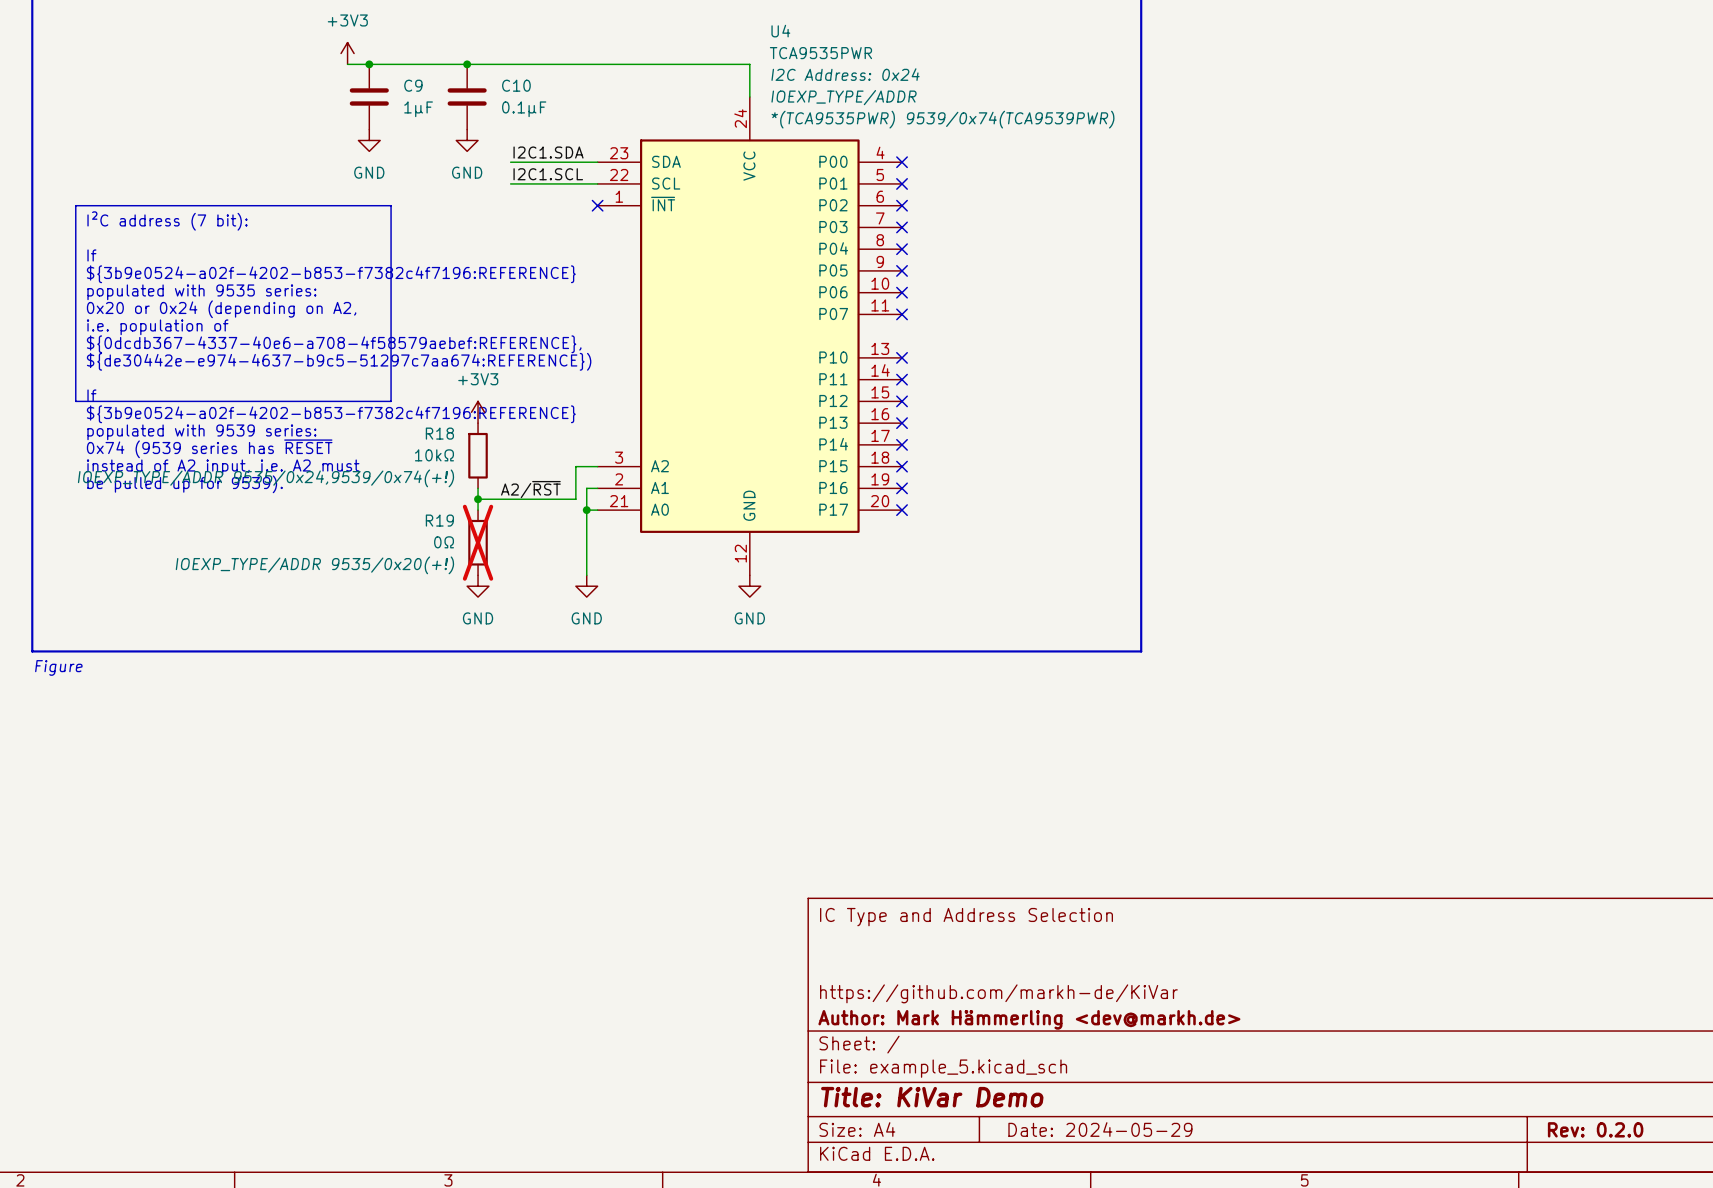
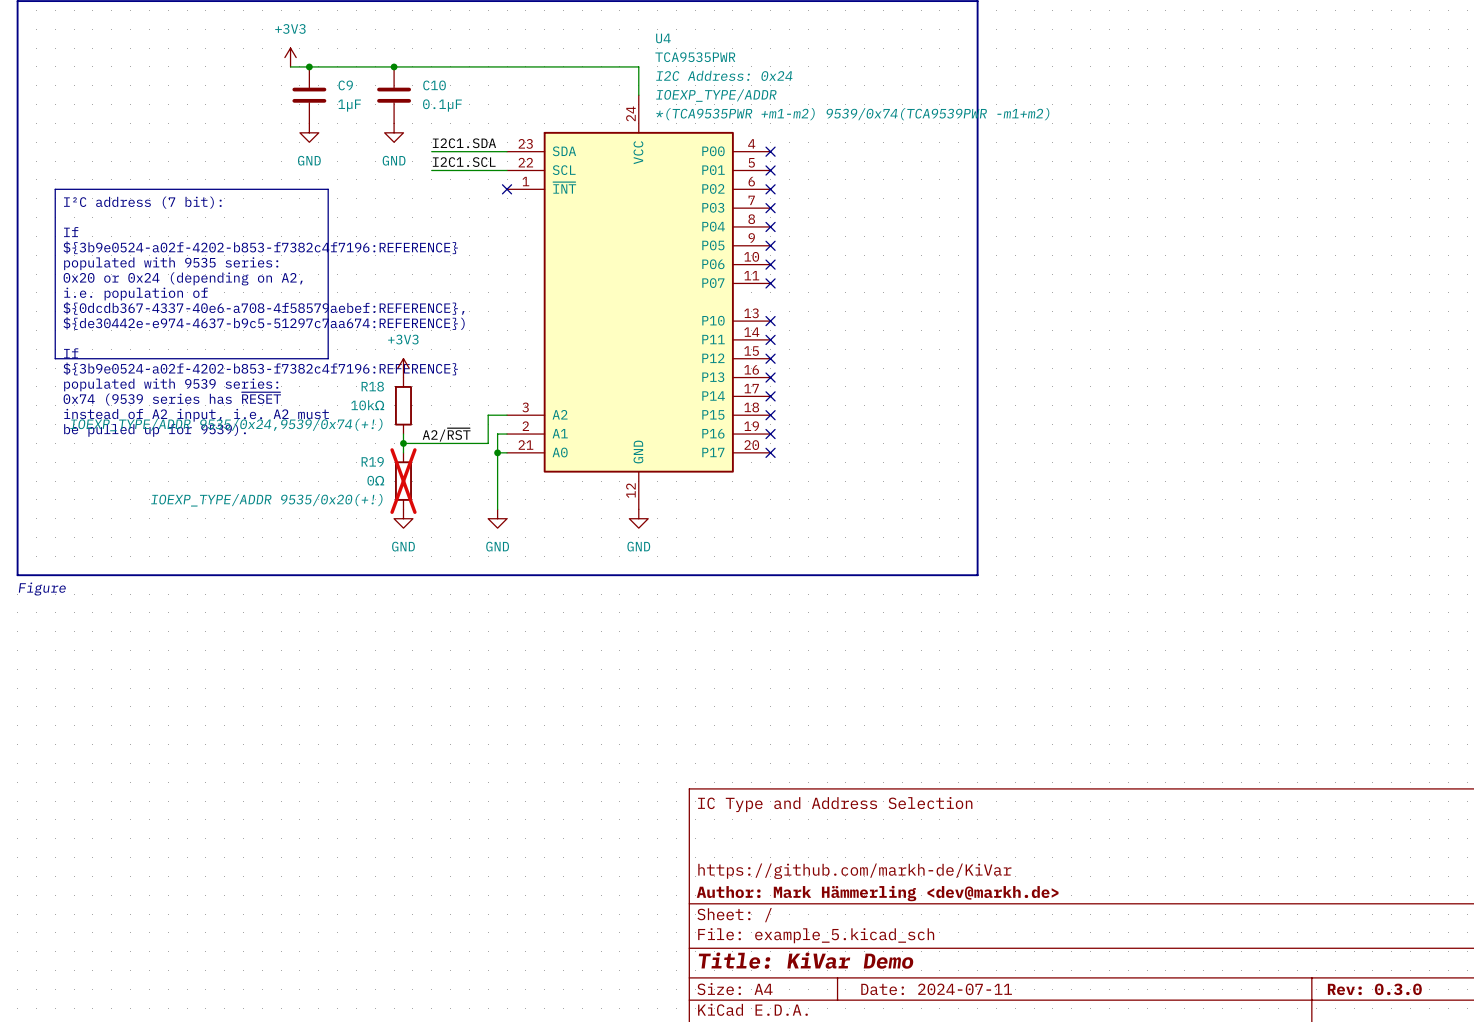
U4 text: *(TCA9535PWR) 9539/0x74(TCA9539PWR) (943, 119) -> *(TCA9535PWR +m1-m2) 9539/0x74(TCA9539PWR -m1+m2) (852, 114)
title block: Date: 2024-05-29 (1100, 1129) -> Date: 2024-07-11 (936, 989)
title block: Rev: 0.2.0 (1595, 1129) -> Rev: 0.3.0 (1374, 989)

